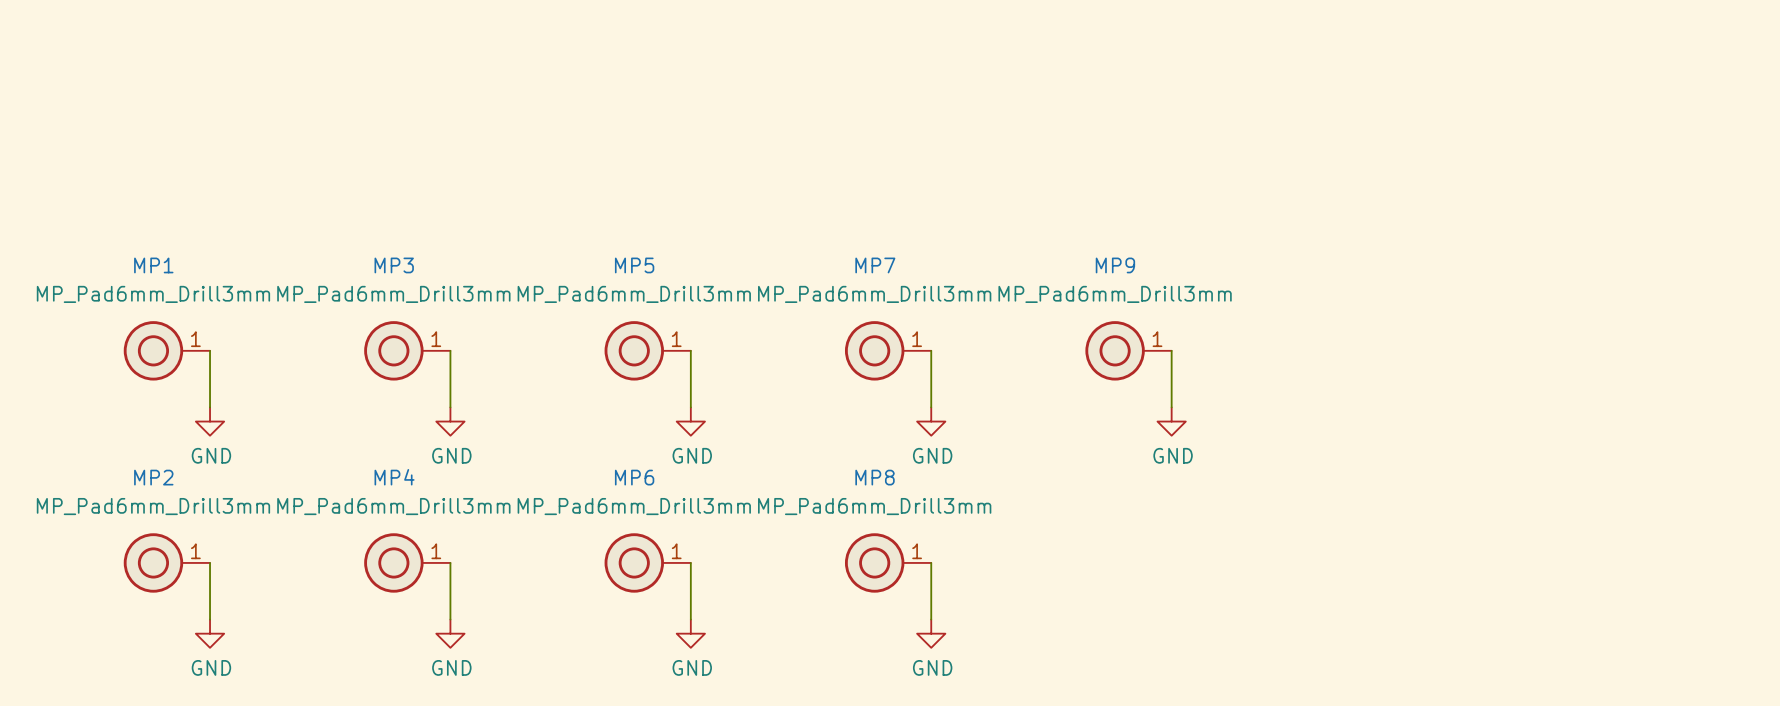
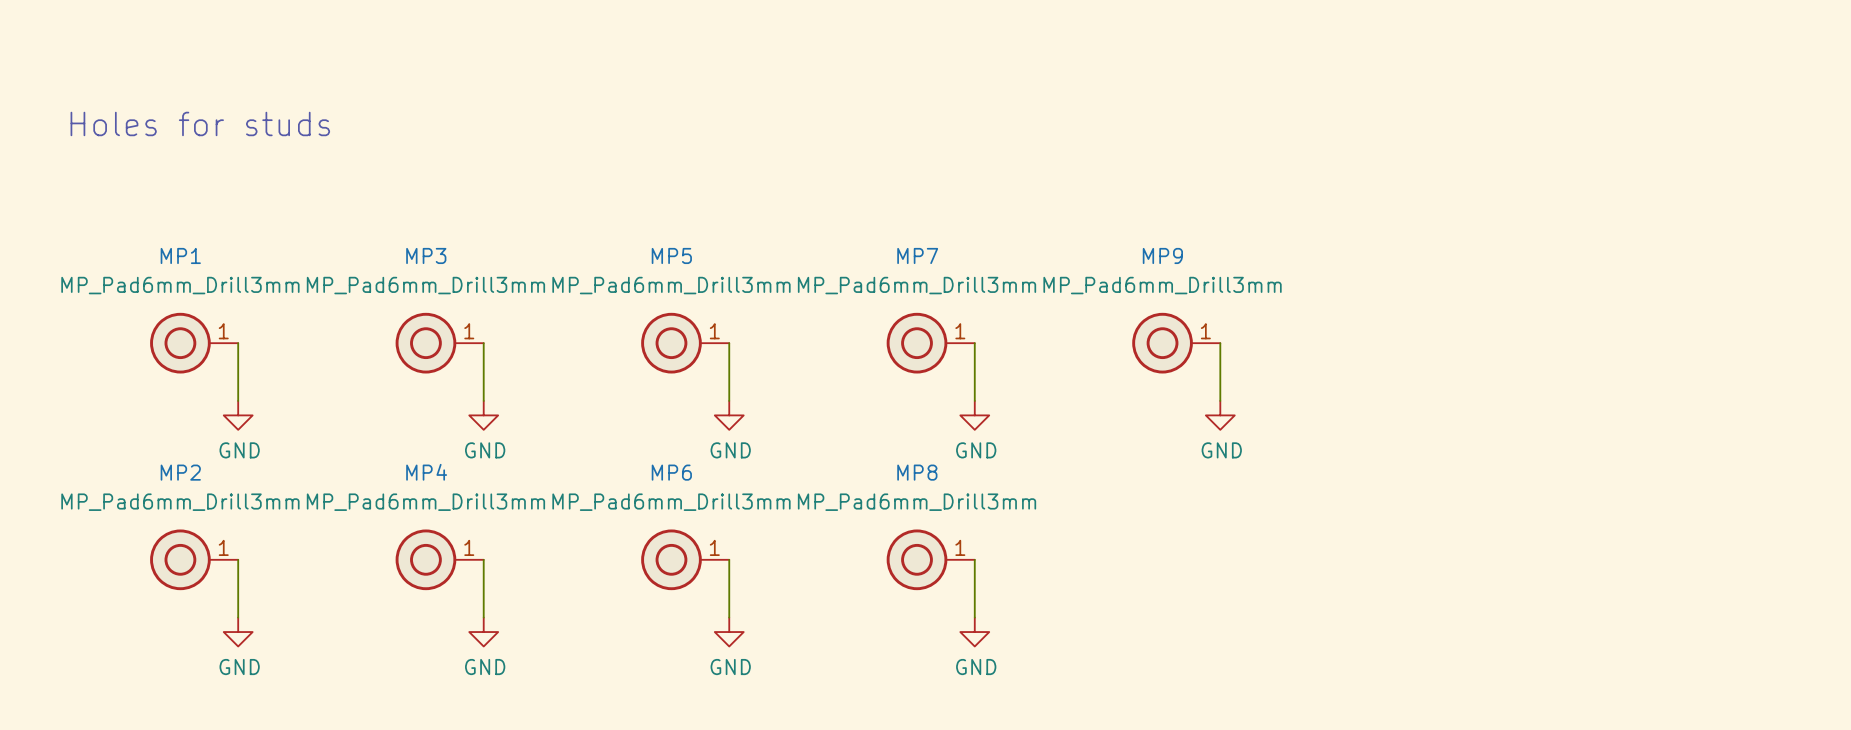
text: none -> Holes for studs (200, 123)

